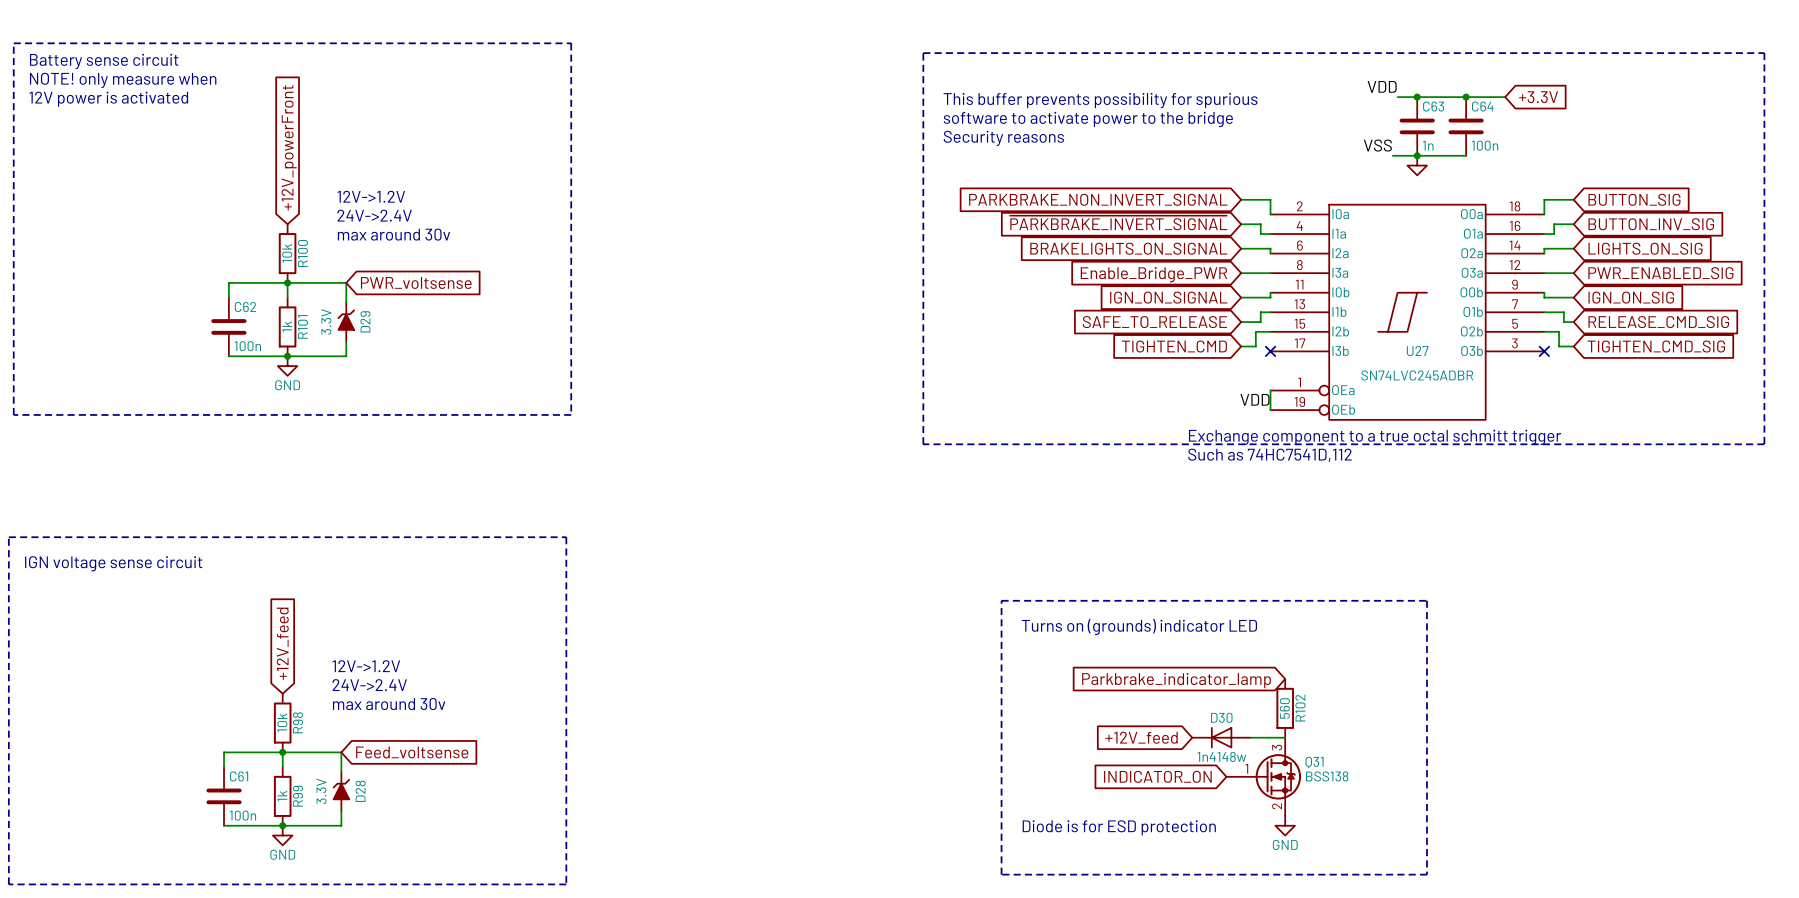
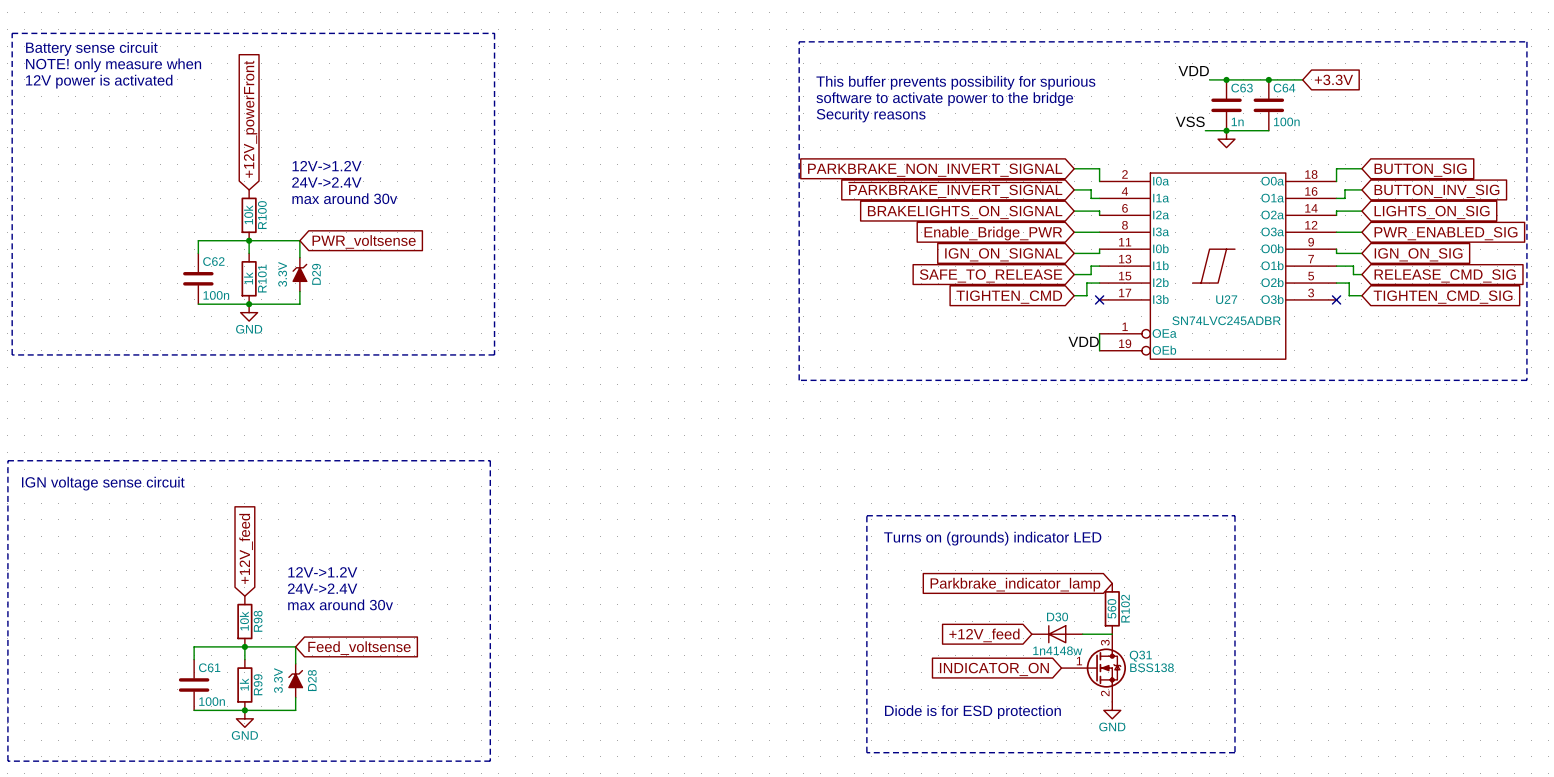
text: Exchange component to a true octal schmitt trigger (1375, 437) -> none
text: Such as 74HC7541D,112 (1270, 455) -> none

